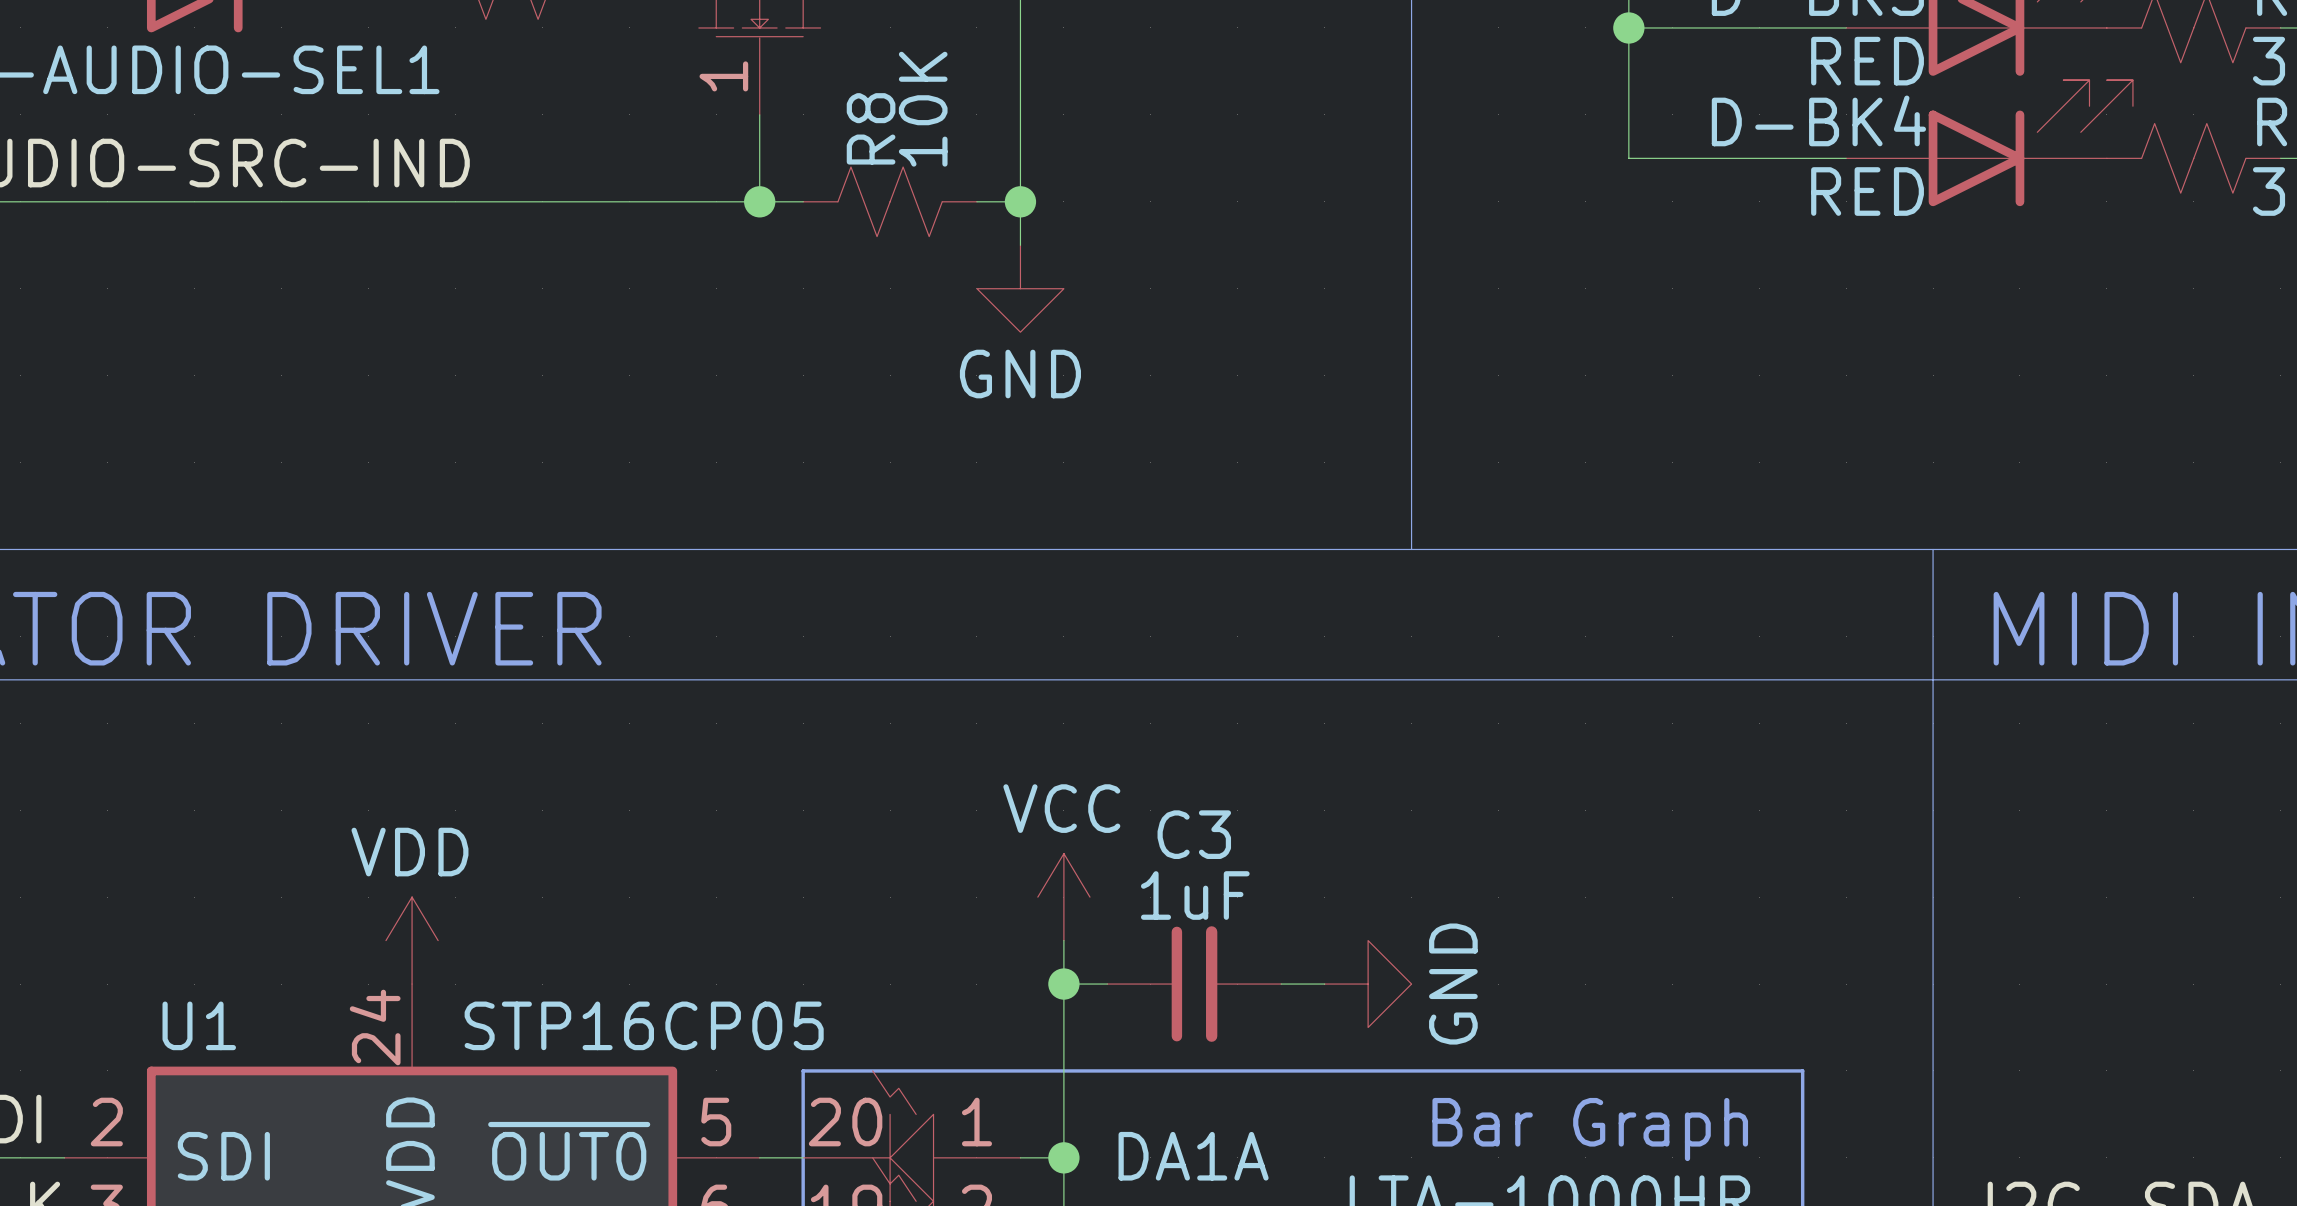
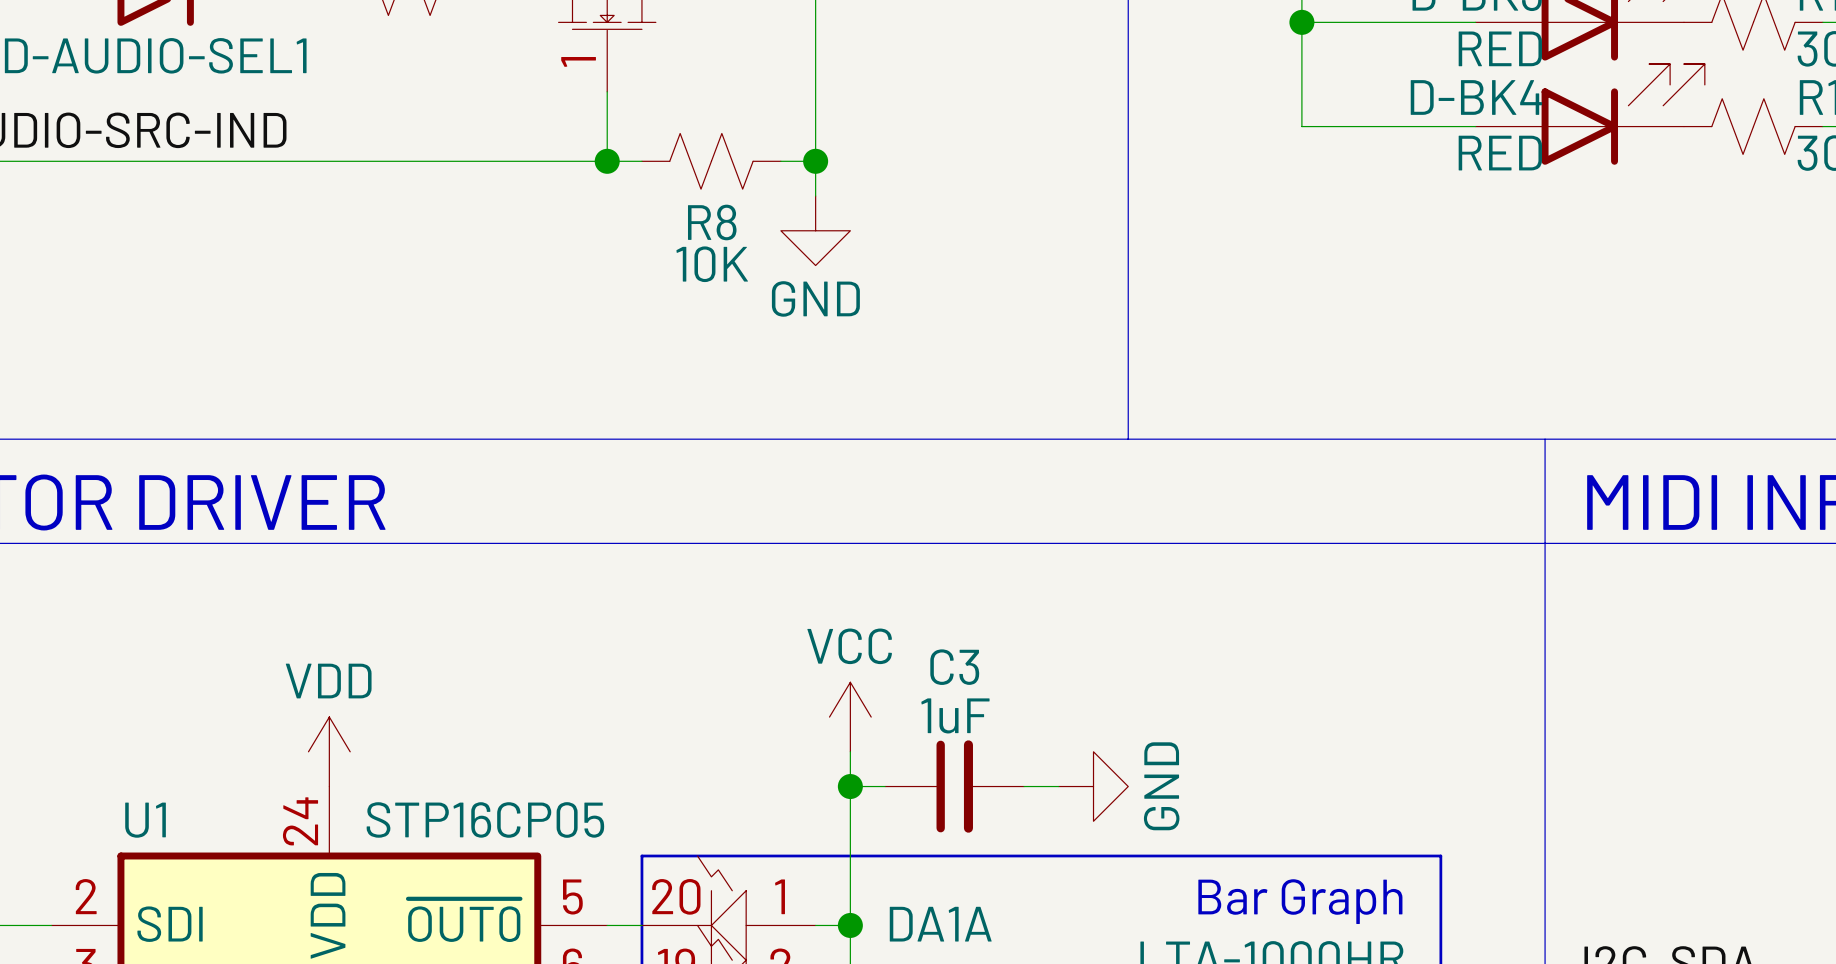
R8 value rotation: 0° (923, 109) -> 90° clockwise (712, 264)
R8 value position: 10K (923, 109) -> 10K (712, 264)
R8 name rotation: 0° (871, 128) -> 90° clockwise (712, 222)
R8 name position: R8 (871, 128) -> R8 (712, 222)

